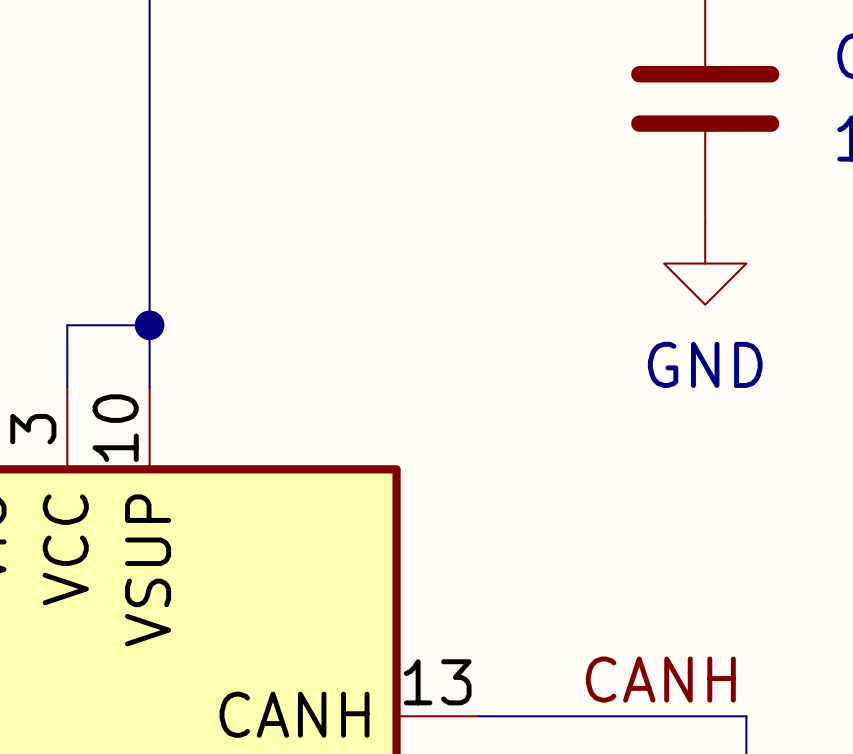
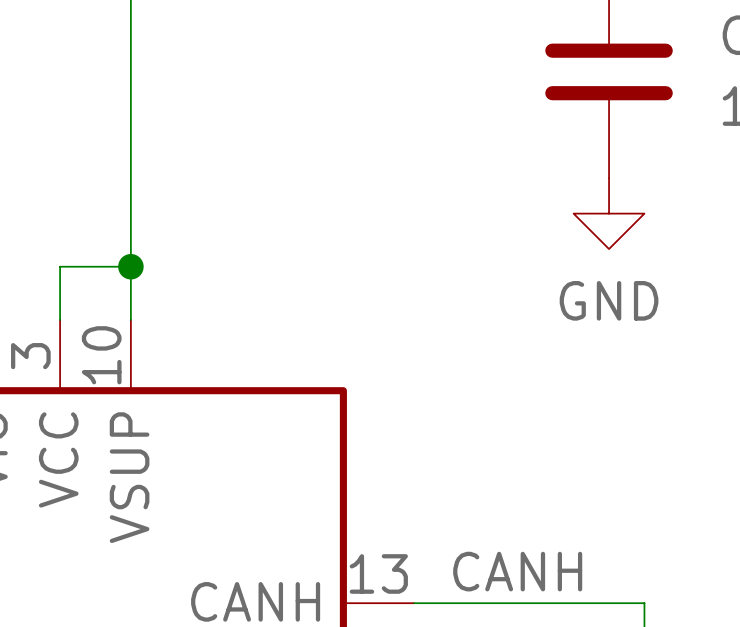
label position: CANH (660, 679) -> CANH (517, 571)

